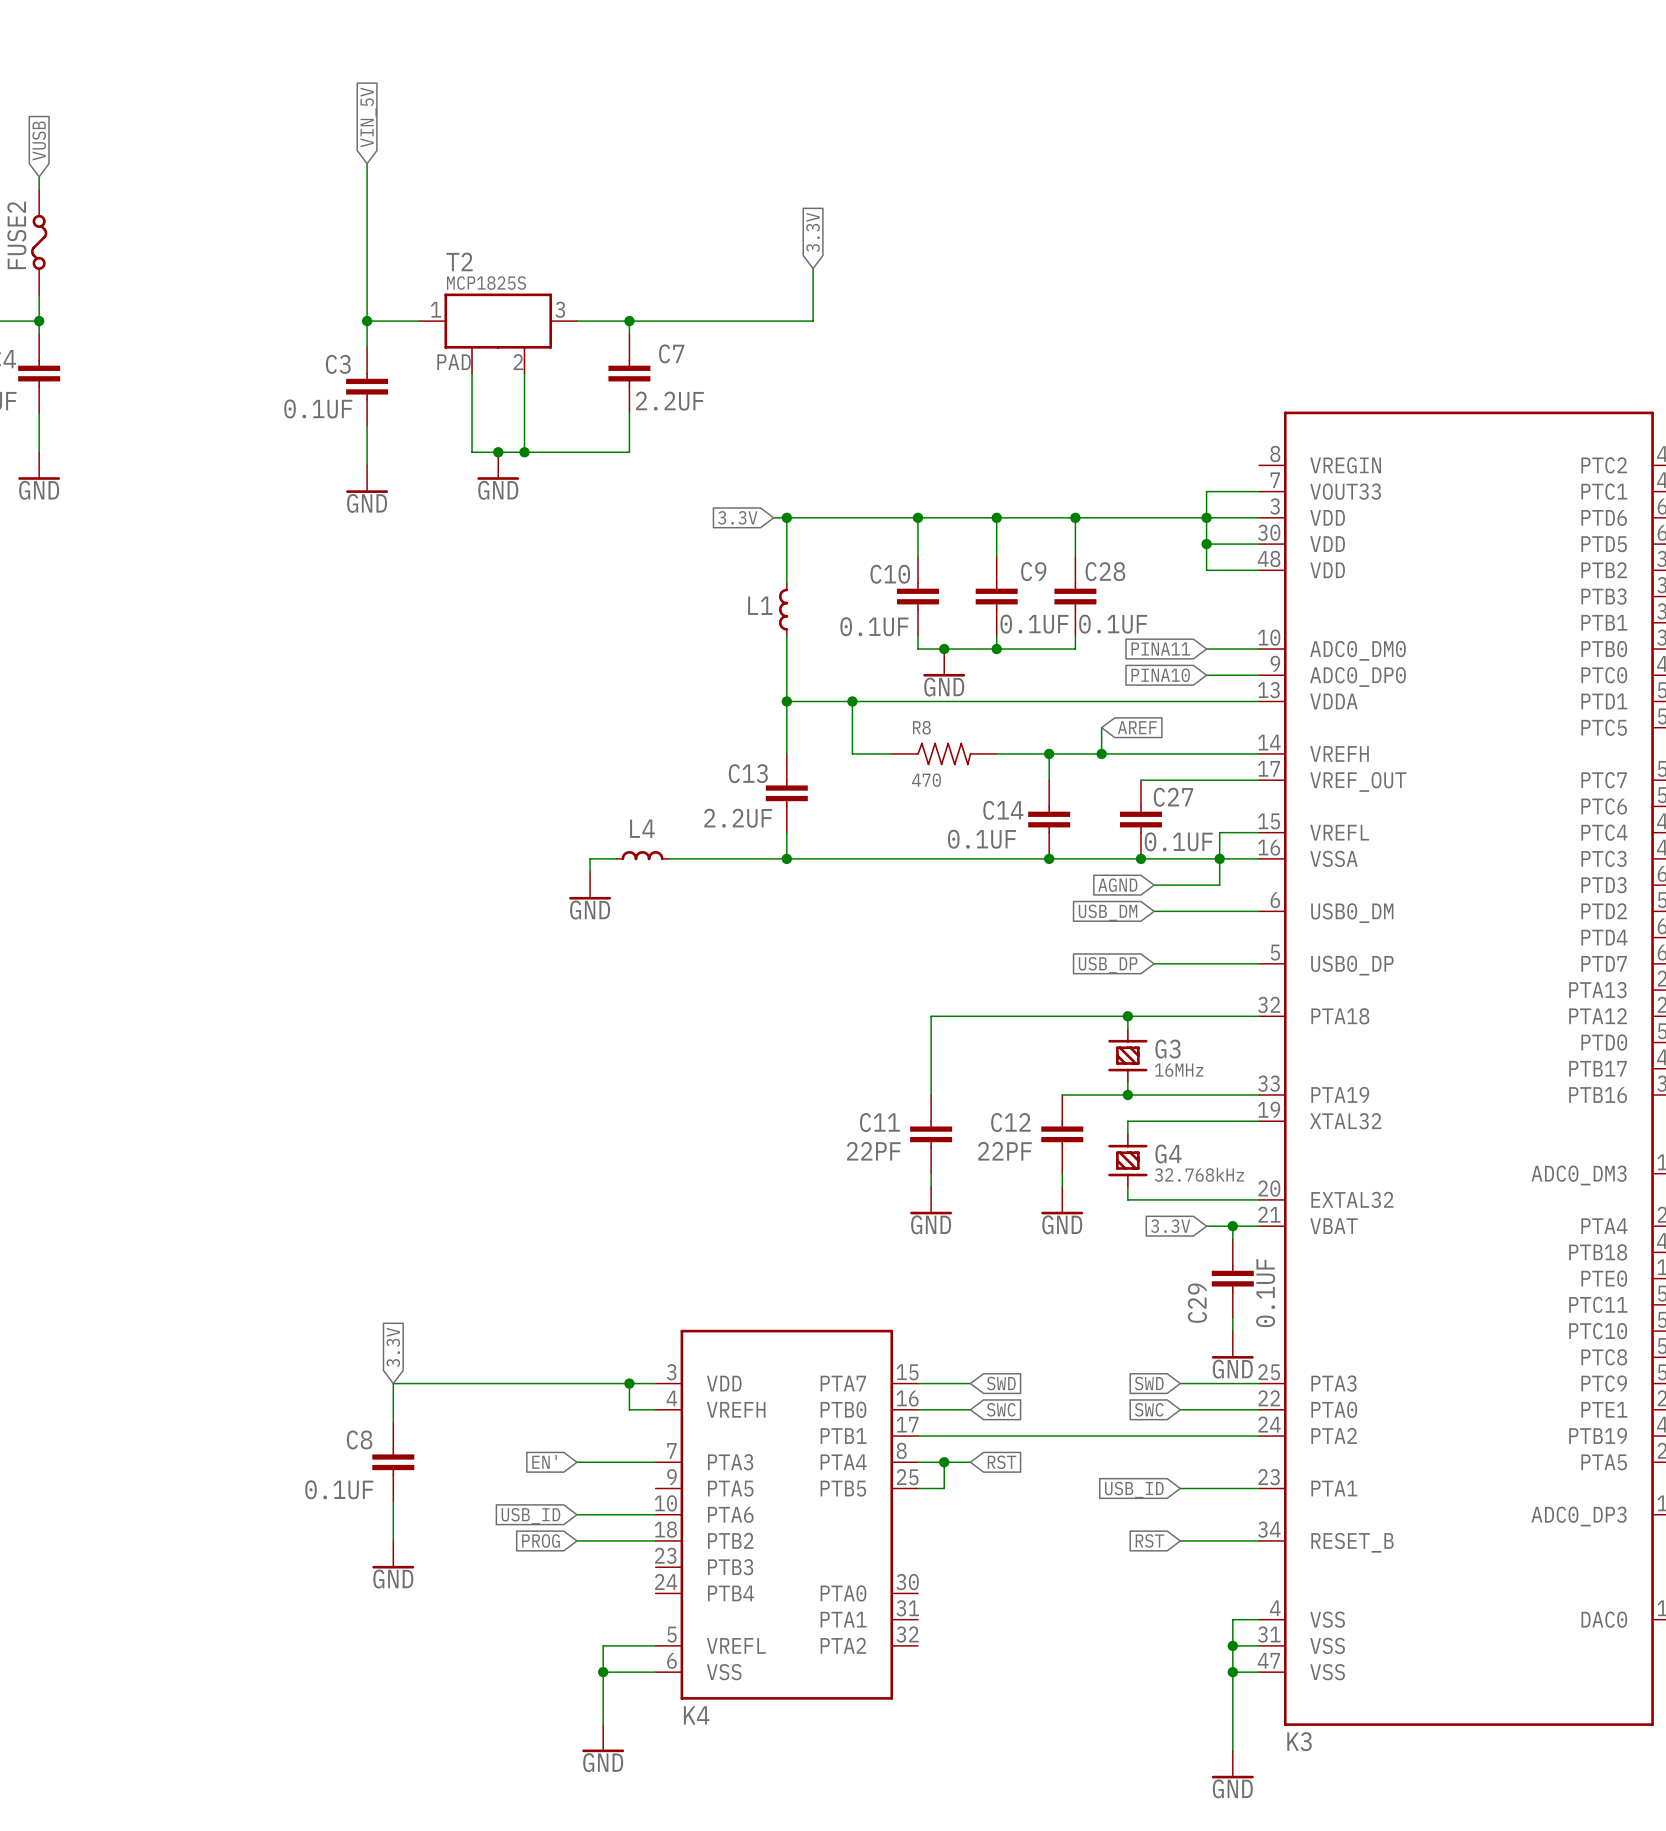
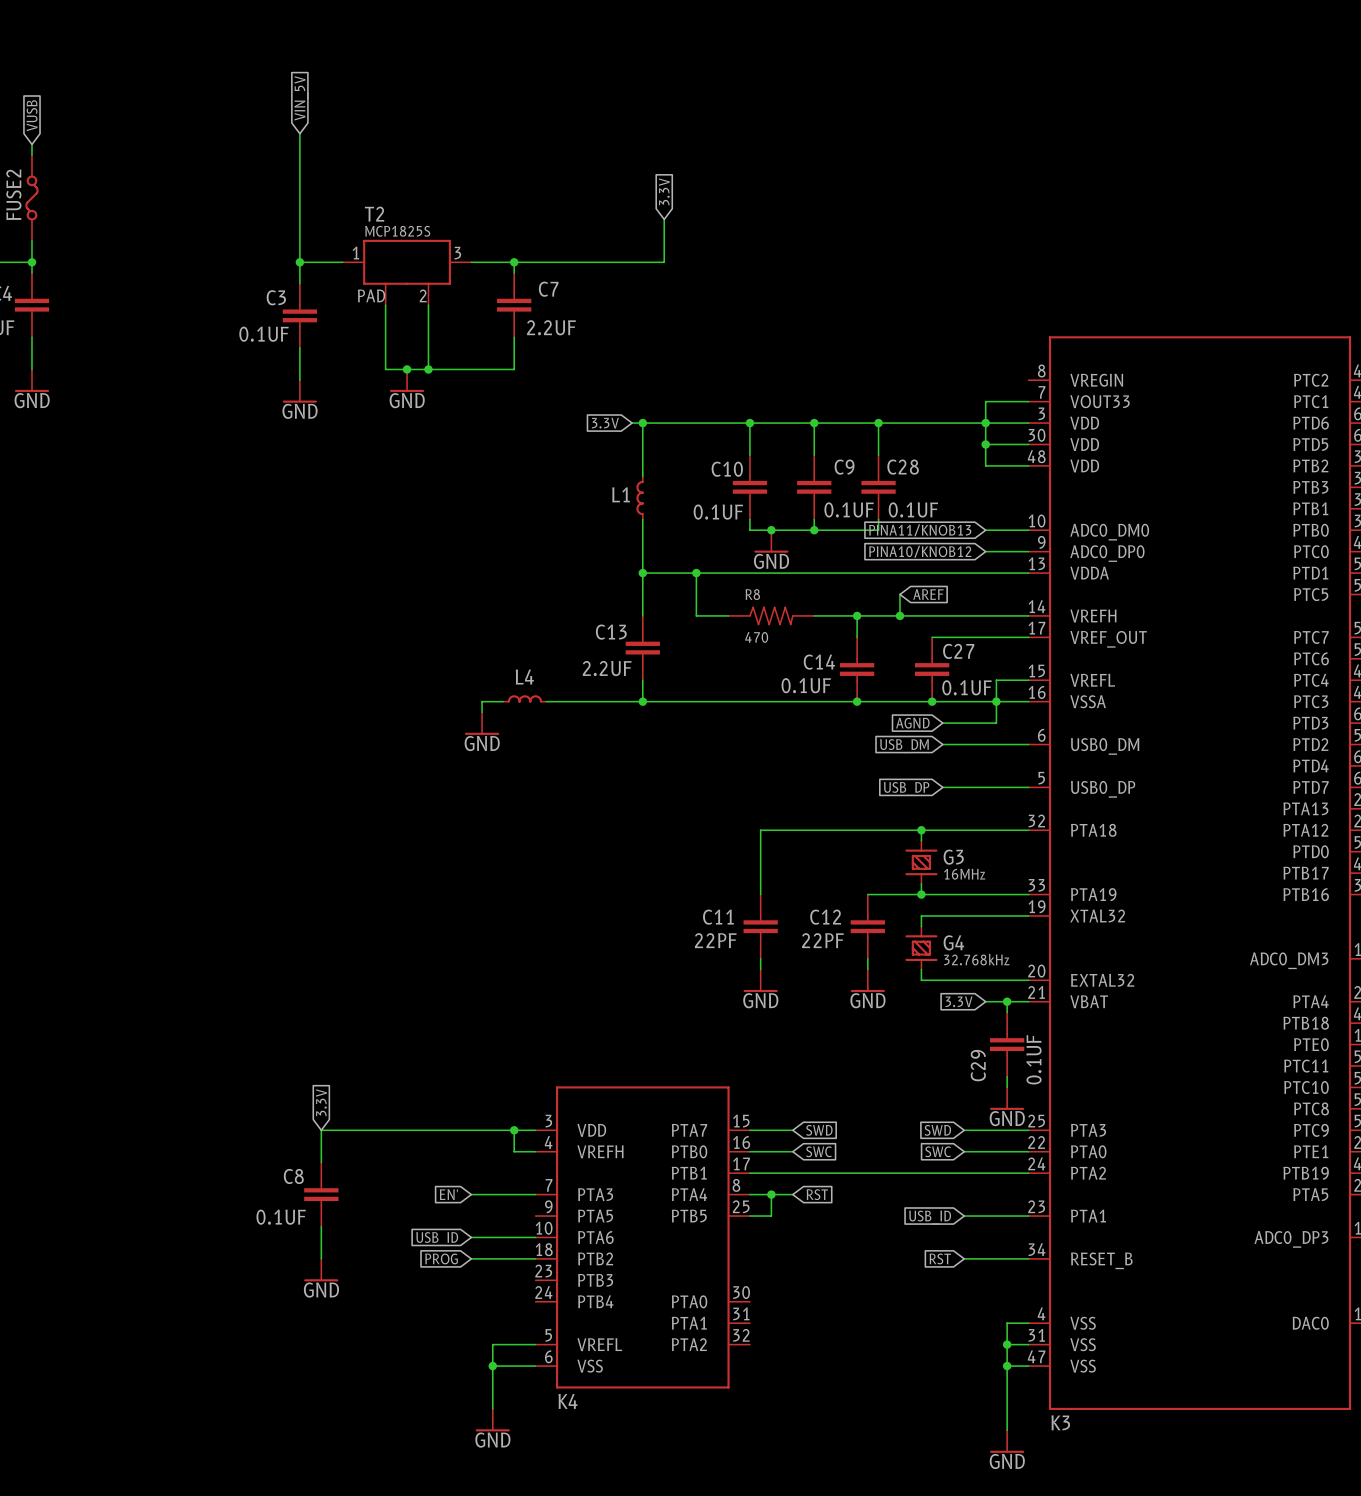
global label: PINA11 (1160, 649) -> PINA11/KNOB13 (920, 530)
global label: PINA10 (1160, 675) -> PINA10/KNOB12 (920, 551)

